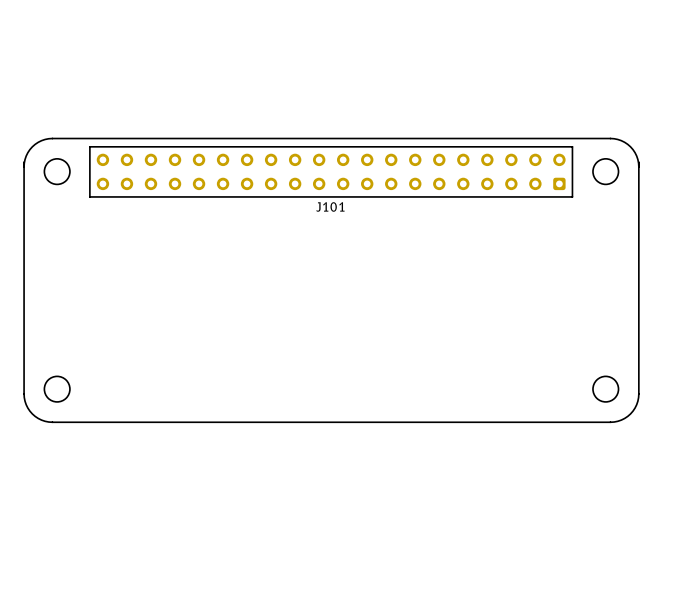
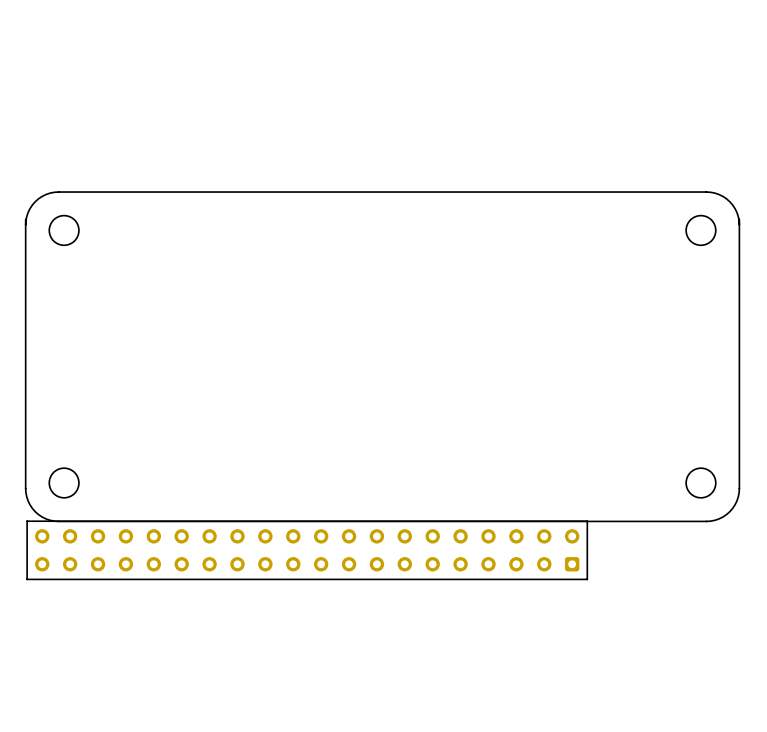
J101: (331, 171) -> none
part: none -> (307, 550)

